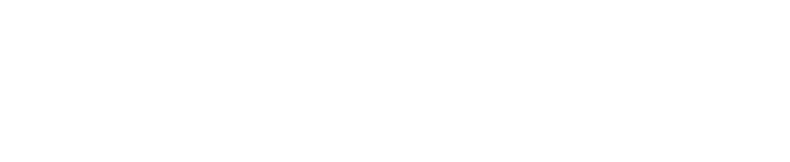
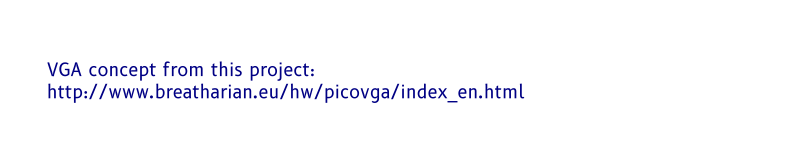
text: none -> VGA concept from this project: (180, 71)
text: none -> http://www.breatharian.eu/hw/picovga/index_en.html (286, 93)

